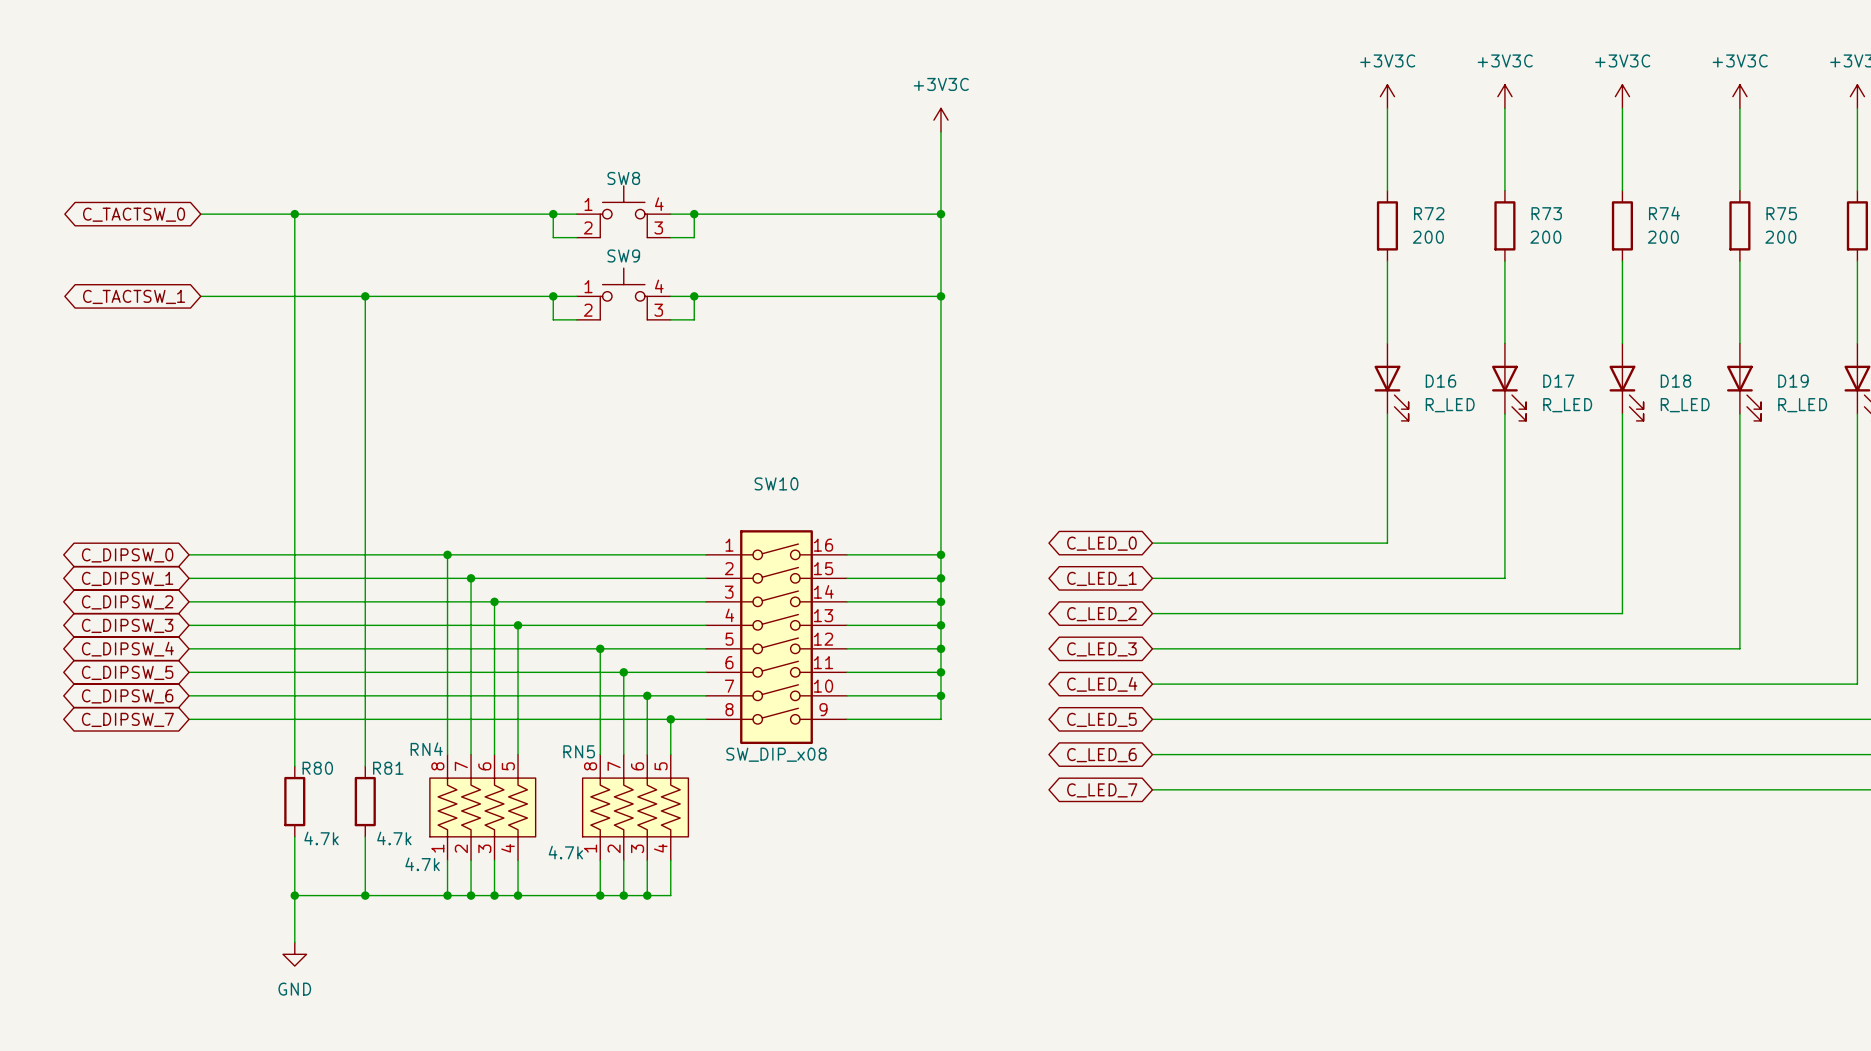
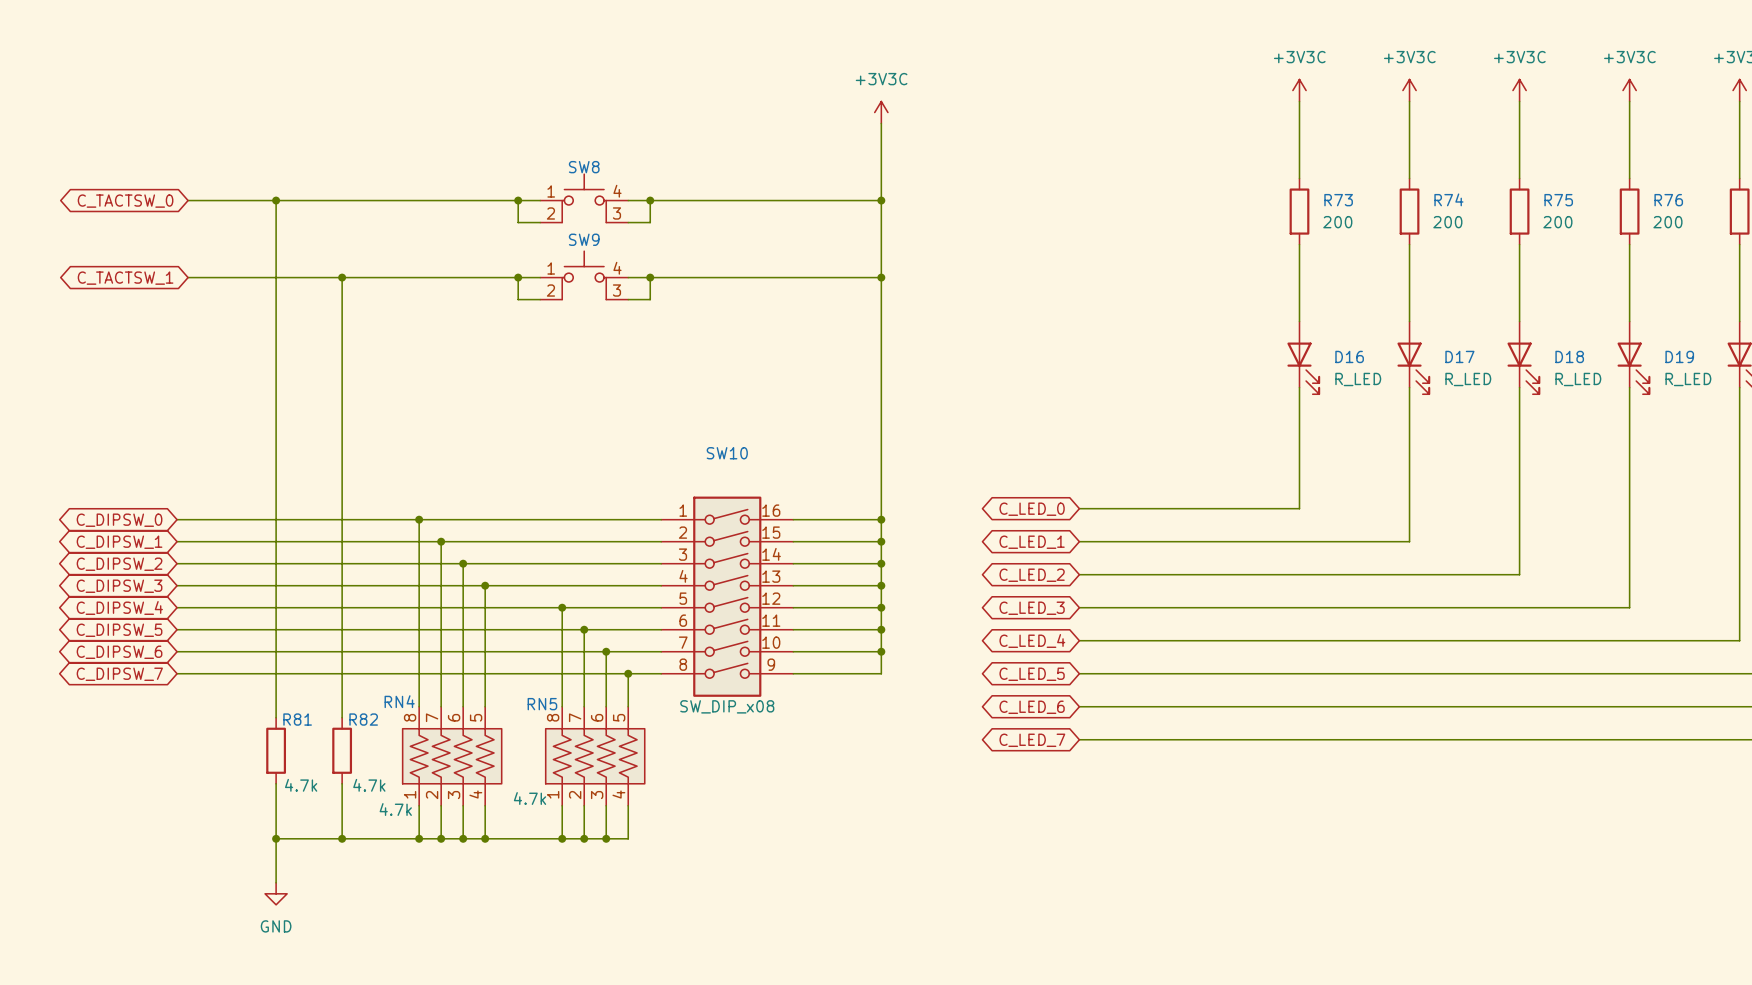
R72 name: R72 (1429, 213) -> R73 (1338, 200)
R73 name: R73 (1546, 213) -> R74 (1448, 199)
R74 name: R74 (1664, 213) -> R75 (1558, 200)
R75 name: R75 (1781, 213) -> R76 (1668, 200)
R80 name: R80 (317, 768) -> R81 (297, 719)
R81 name: R81 (388, 768) -> R82 (363, 719)

